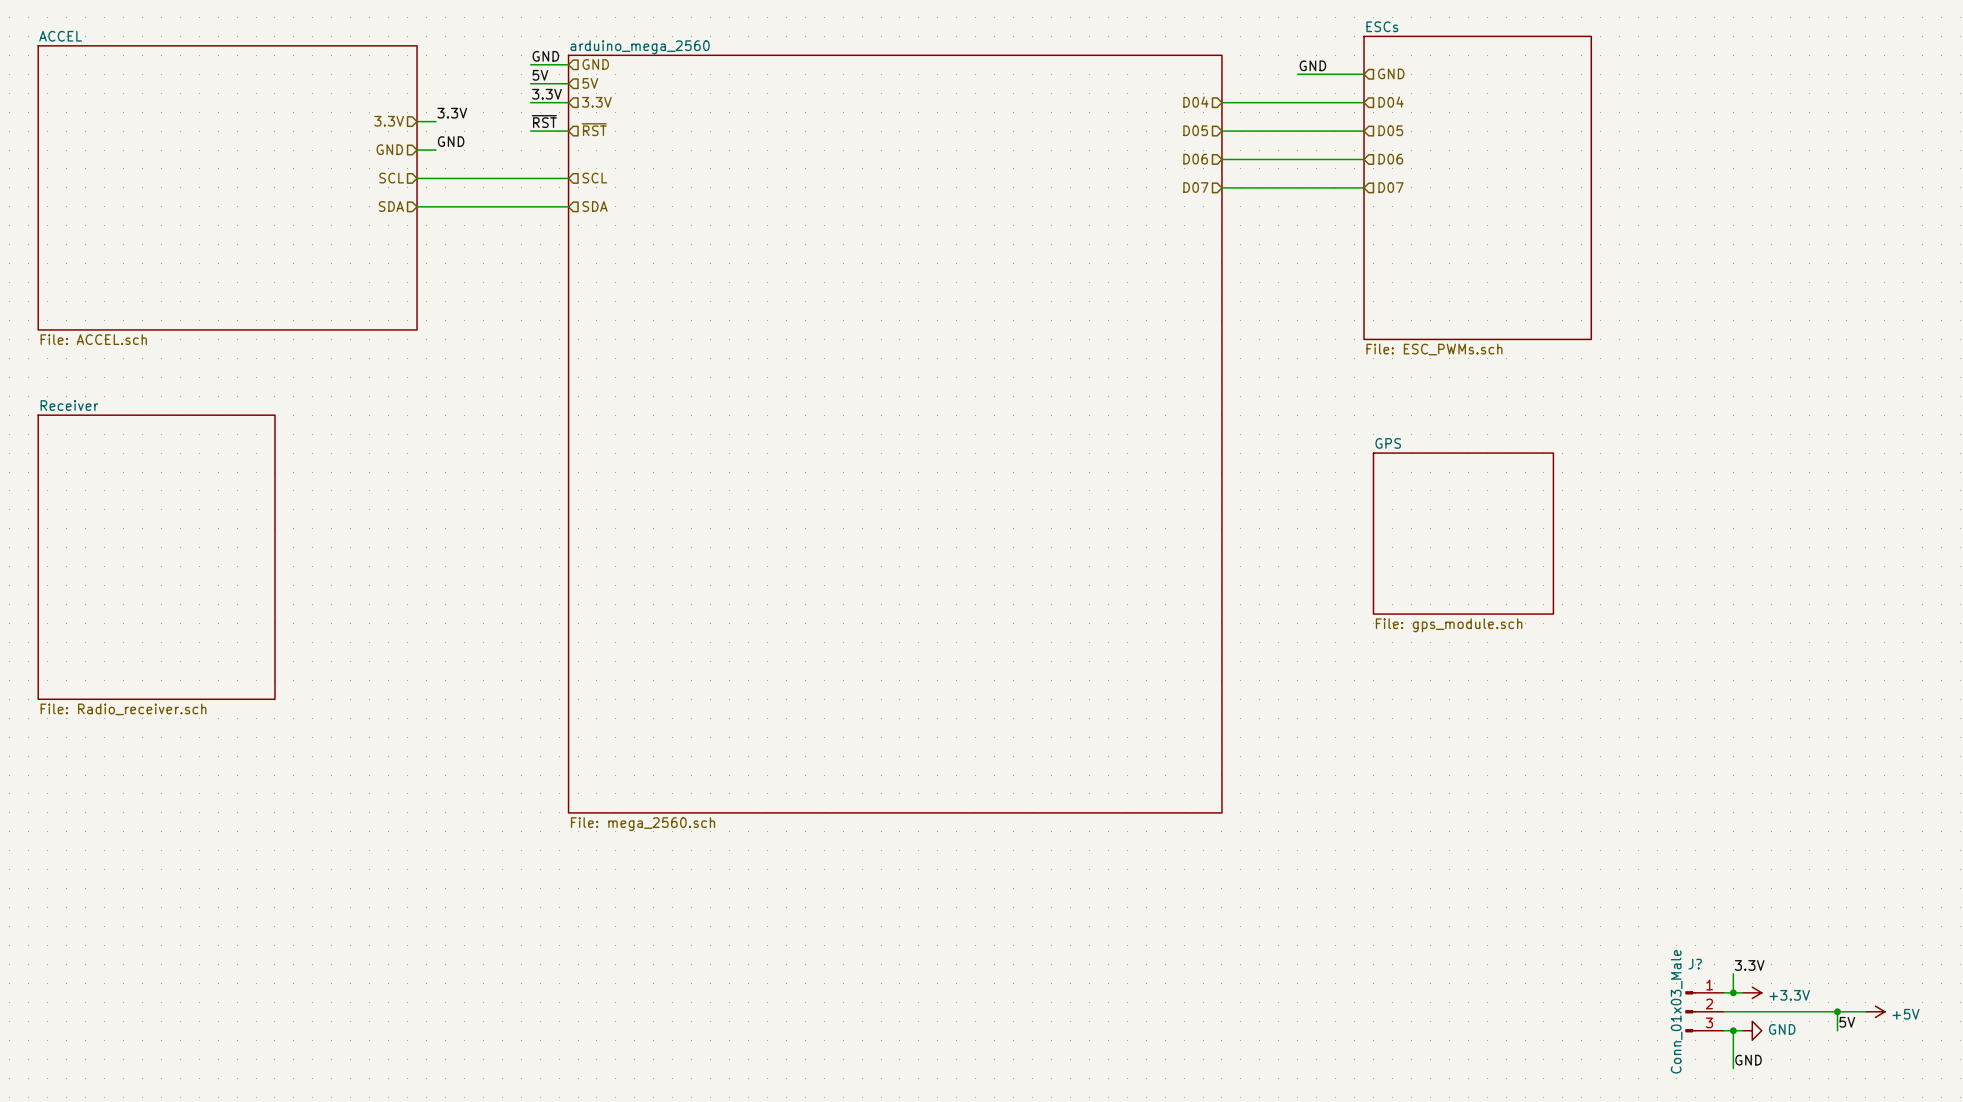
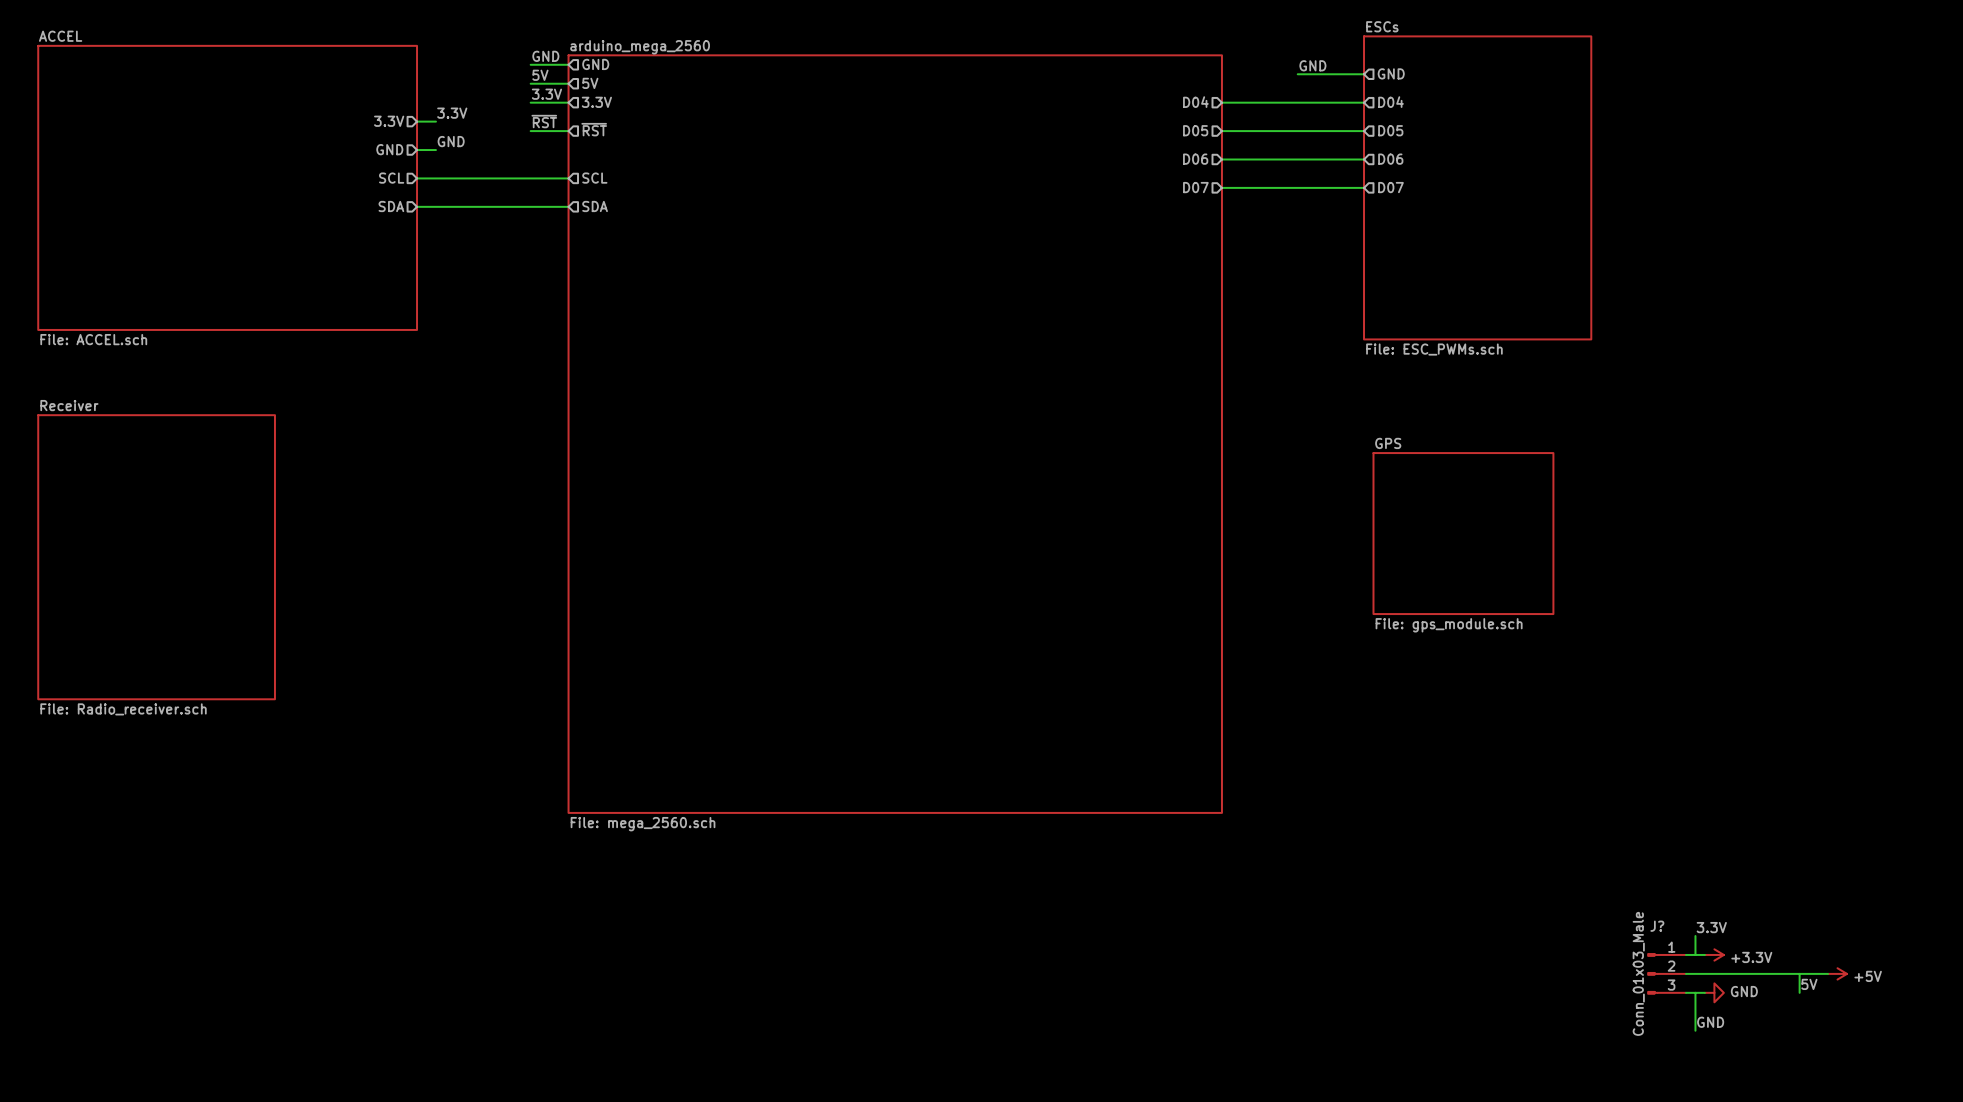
label position: 3.3V (1749, 965) -> 3.3V (1711, 927)
wire: (1733, 973) (1733, 992) -> (1695, 936) (1695, 954)
wire: (1723, 992) (1742, 992) -> (1685, 954) (1704, 954)
junction: (1733, 992) -> none
power symbol position: +3.3V (1752, 992) -> +3.3V (1714, 954)
J? position: (1704, 1011) -> (1666, 973)
wire: (1723, 1011) (1865, 1011) -> (1685, 973) (1828, 973)
wire: (1837, 1011) (1837, 1030) -> (1799, 973) (1799, 992)
junction: (1837, 1011) -> none
power symbol position: +5V (1875, 1011) -> +5V (1837, 973)
label position: 5V (1847, 1022) -> 5V (1809, 984)
wire: (1733, 1030) (1733, 1068) -> (1695, 992) (1695, 1030)
junction: (1733, 1030) -> none
power symbol position: GND (1752, 1030) -> GND (1714, 992)
label position: GND (1748, 1060) -> GND (1710, 1022)

